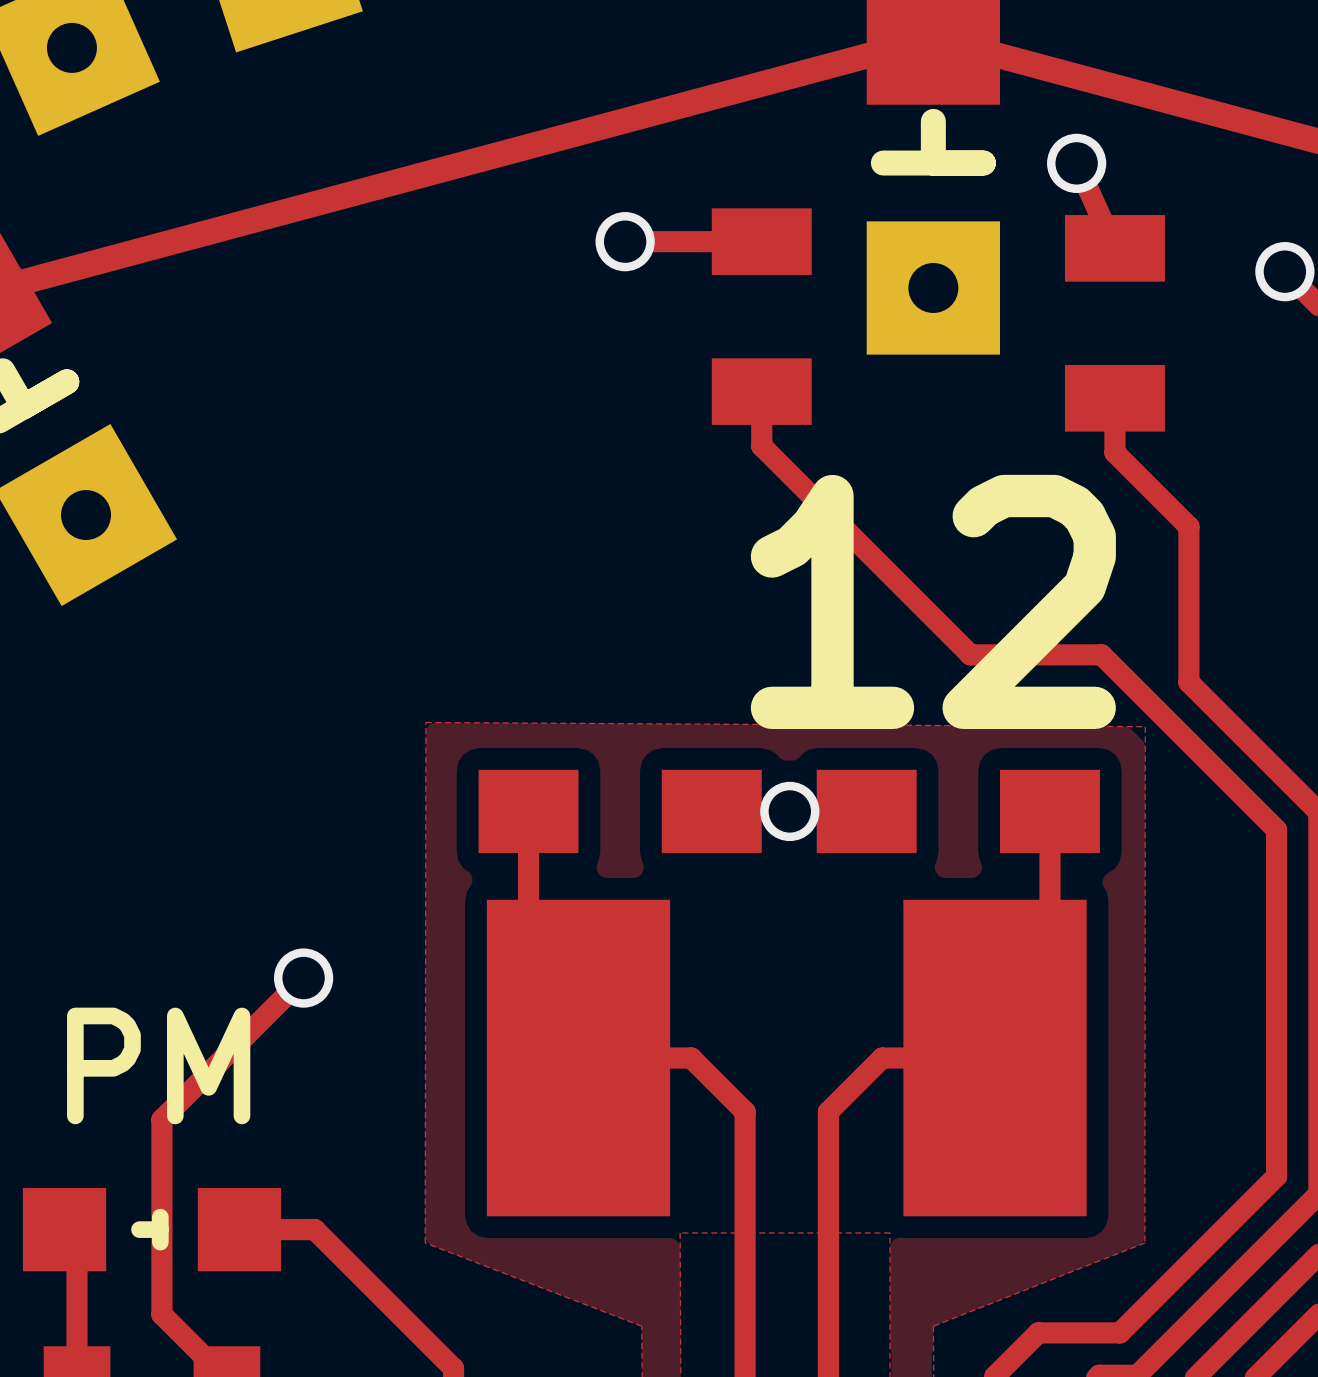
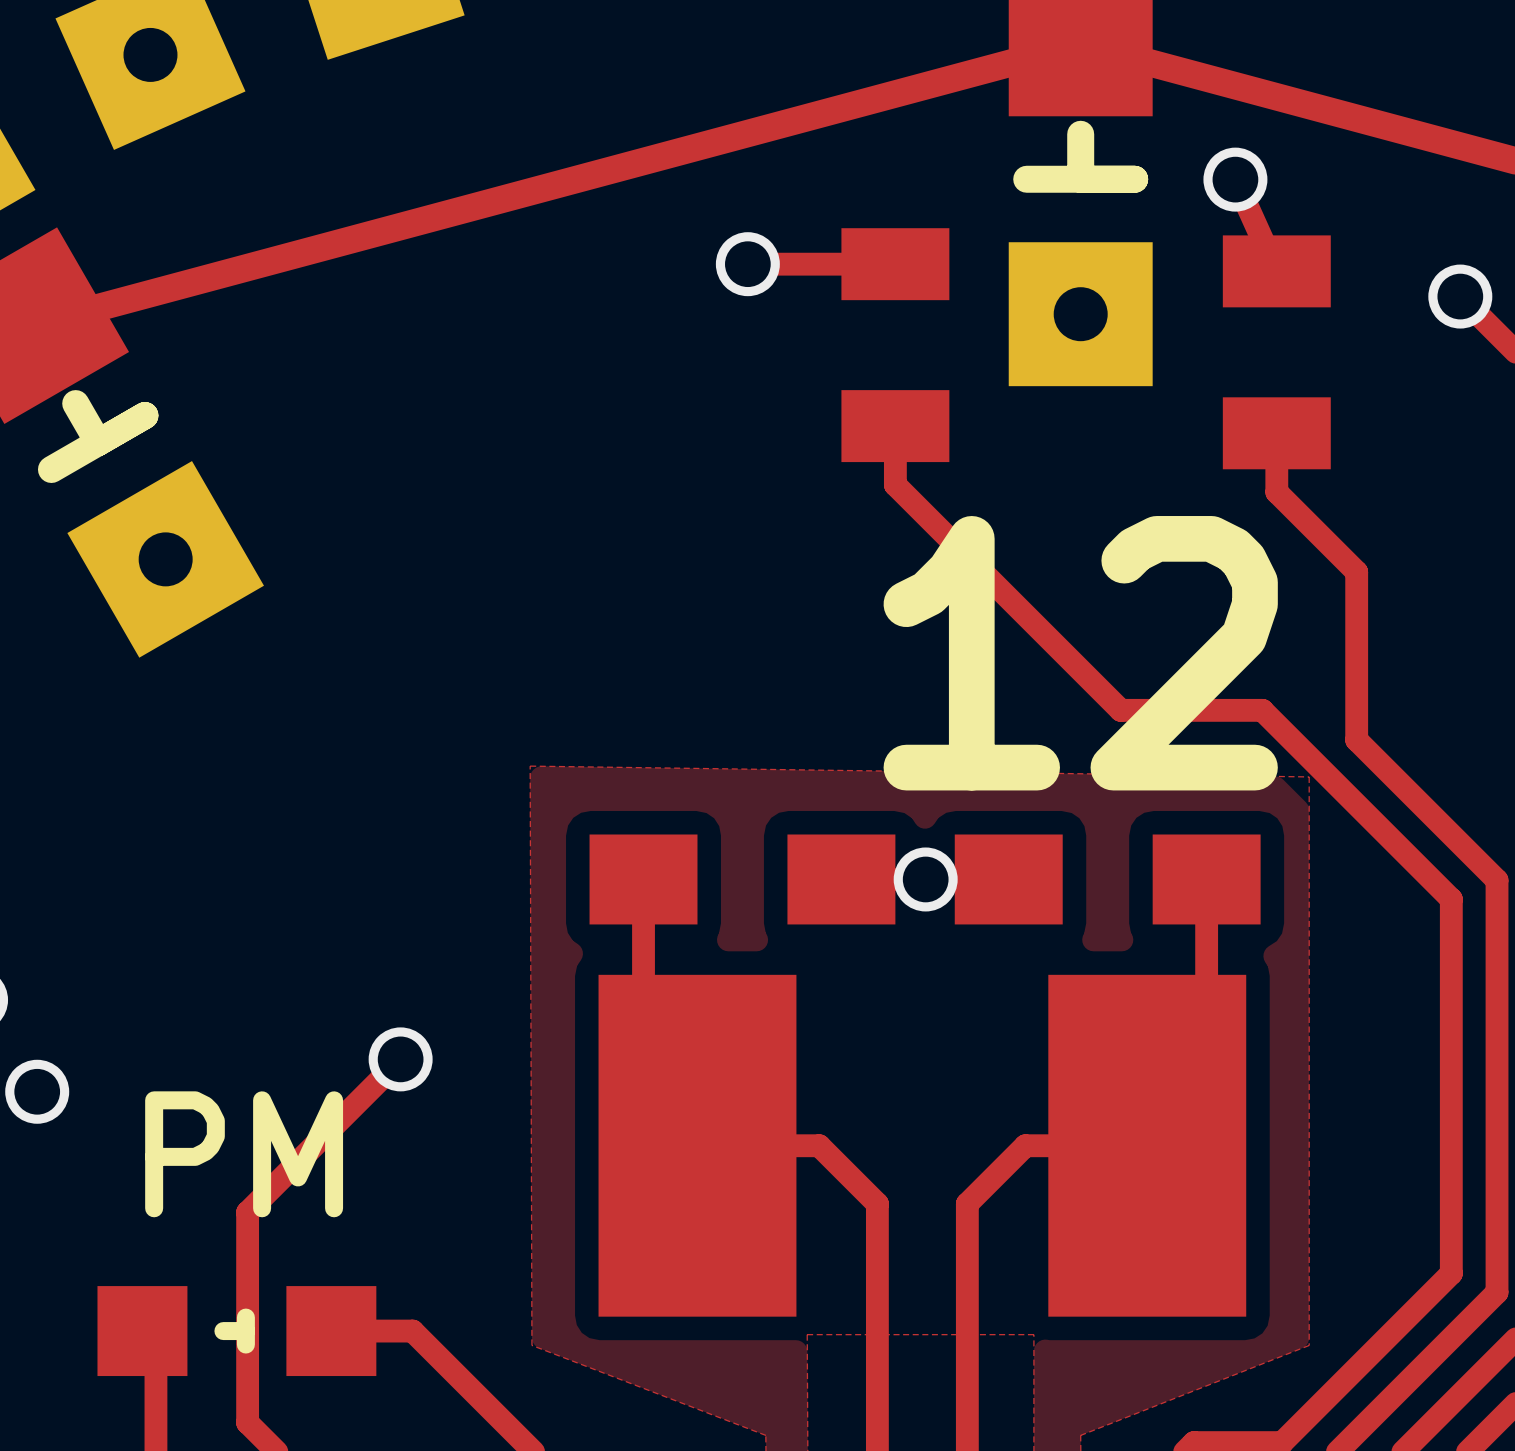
zone outline: (425, 1242) (425, 722) (1145, 726) (1144, 1242) -> (531, 1345) (530, 766) (1309, 776) (1309, 1345)

